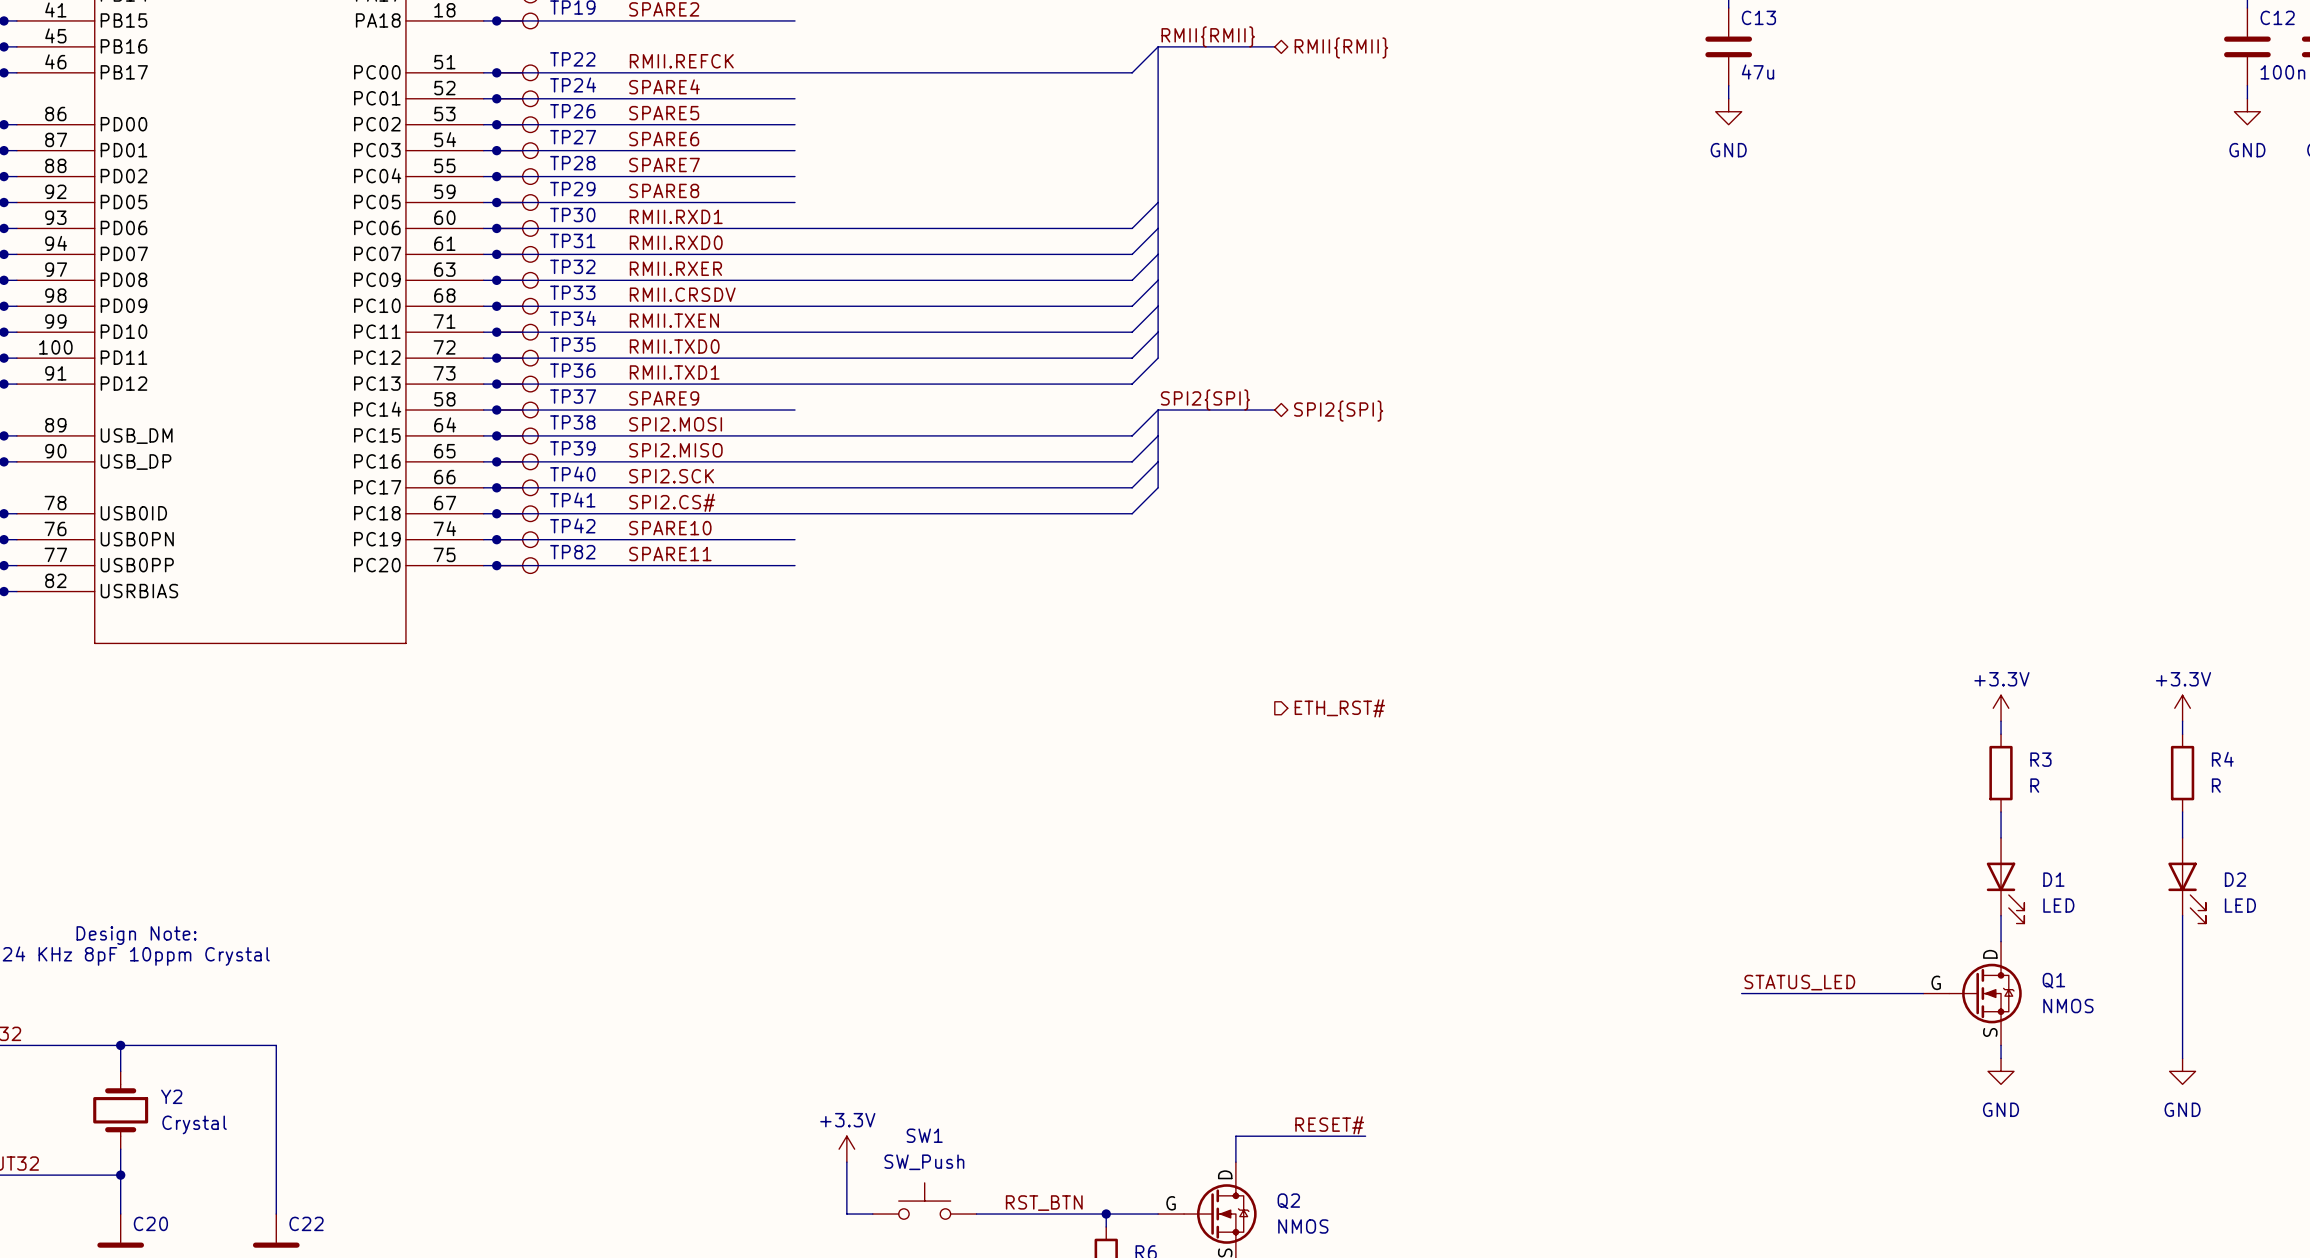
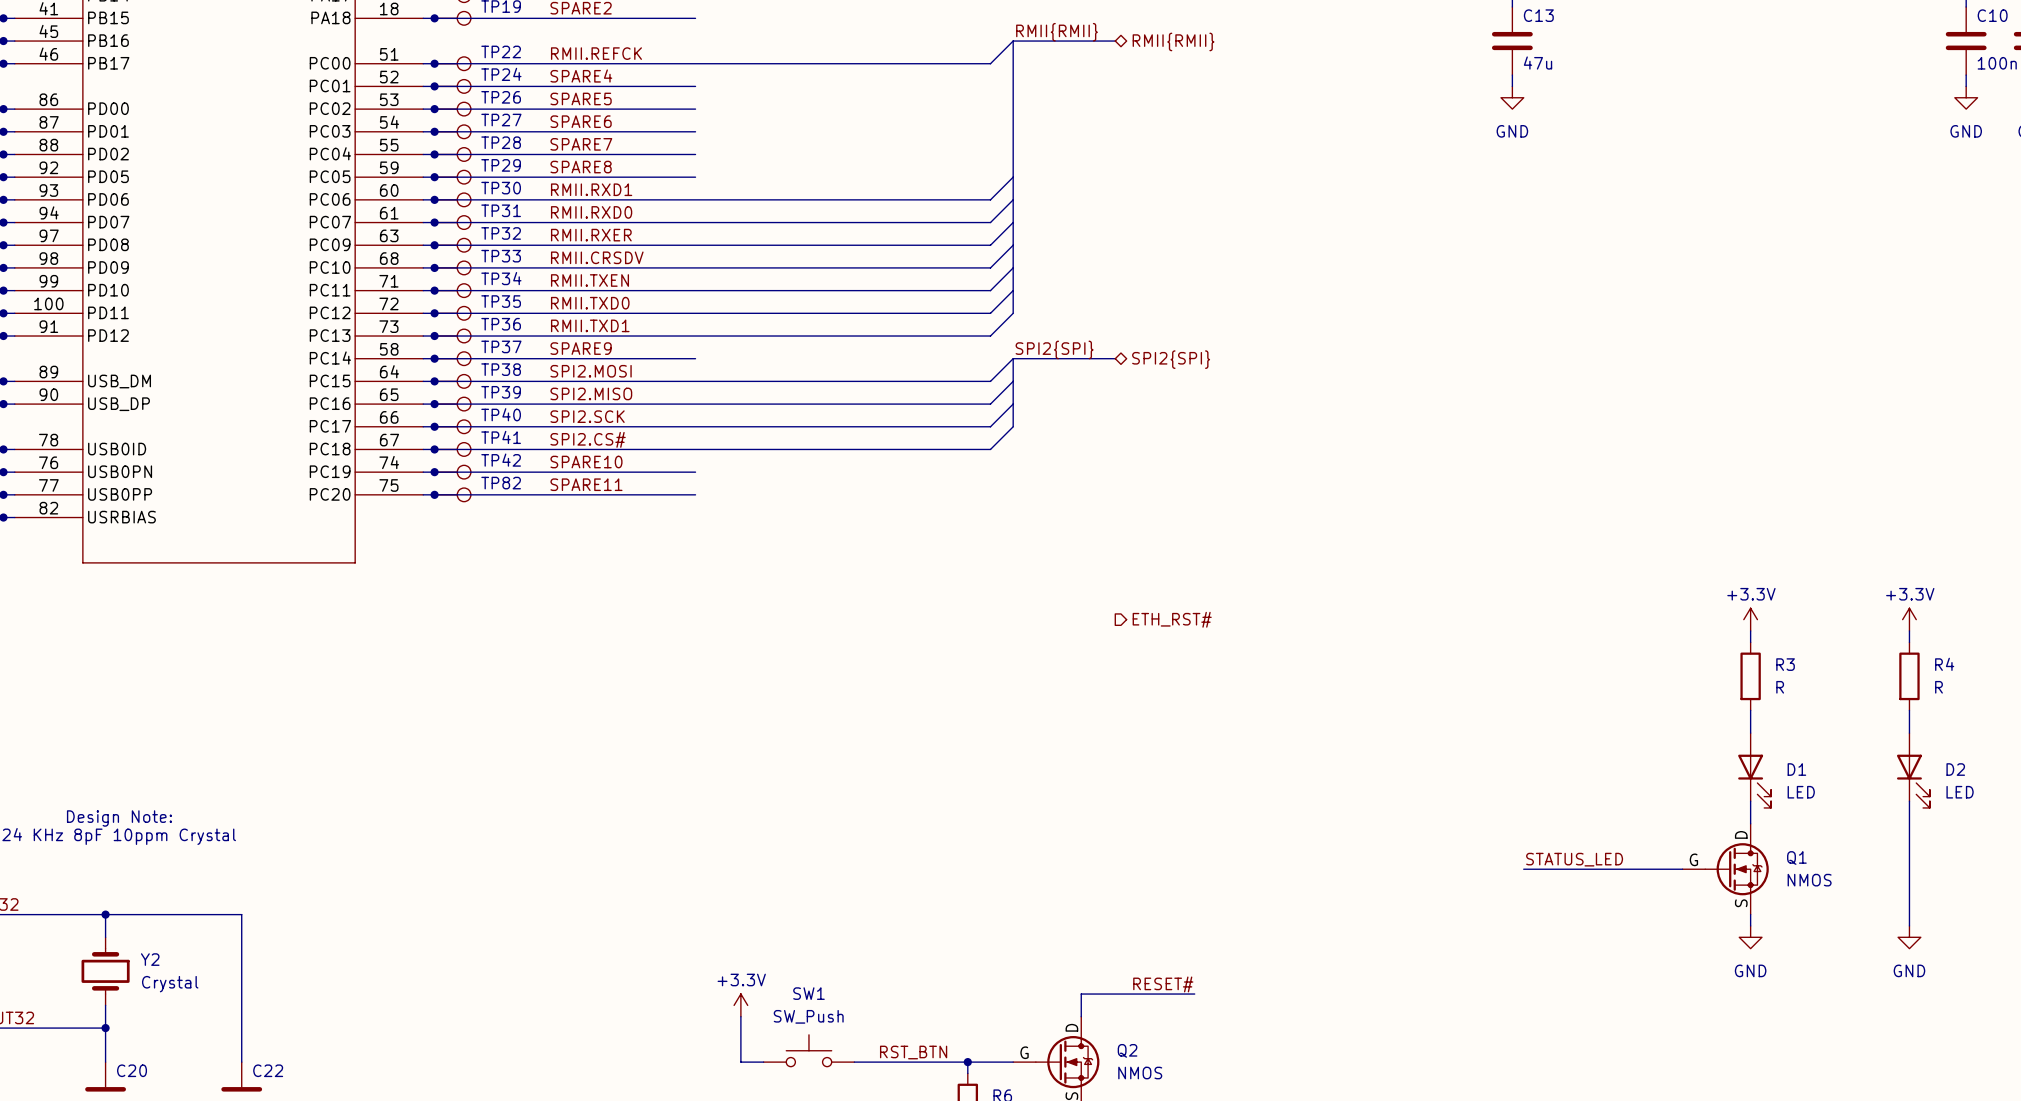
C12 name: C12 (2277, 17) -> C10 (1992, 15)

